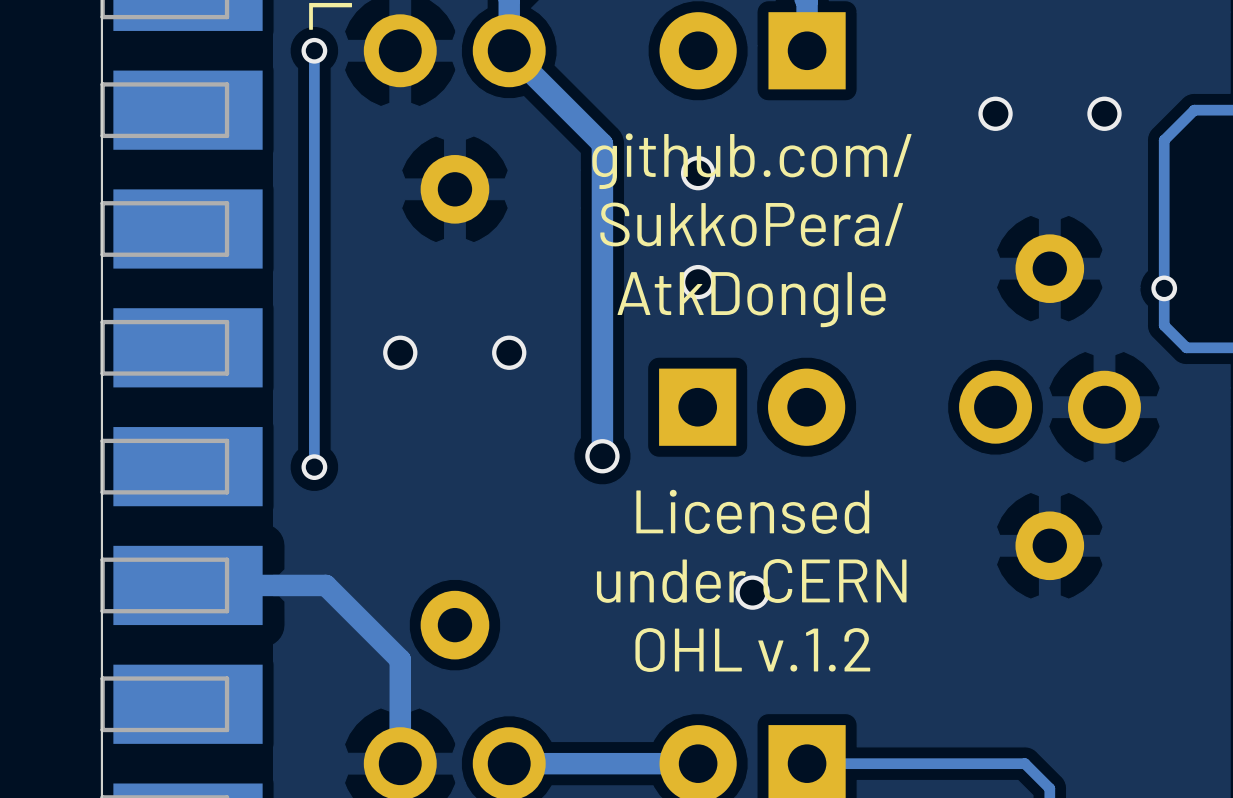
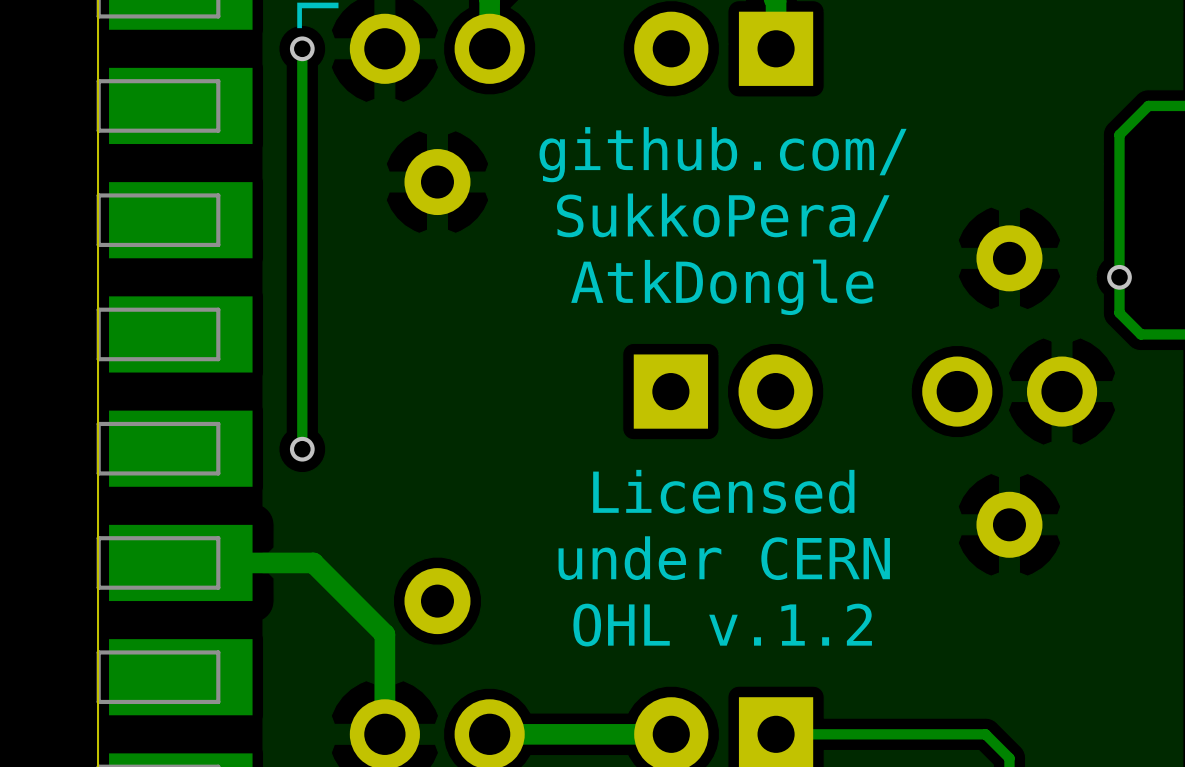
track: (509, 50) (602, 143) (602, 456) -> none
via: (995, 113) -> none
via: (1104, 113) -> none
via: (698, 173) -> none
via: (698, 282) -> none
via: (400, 352) -> none
via: (509, 352) -> none
via: (602, 456) -> none
via: (752, 592) -> none

